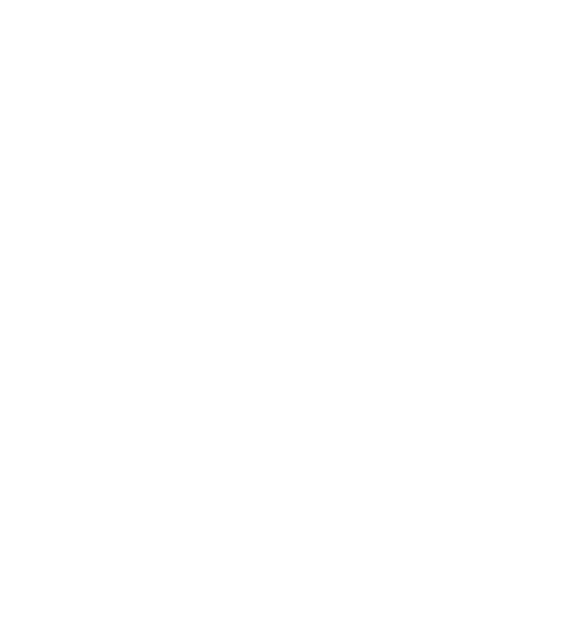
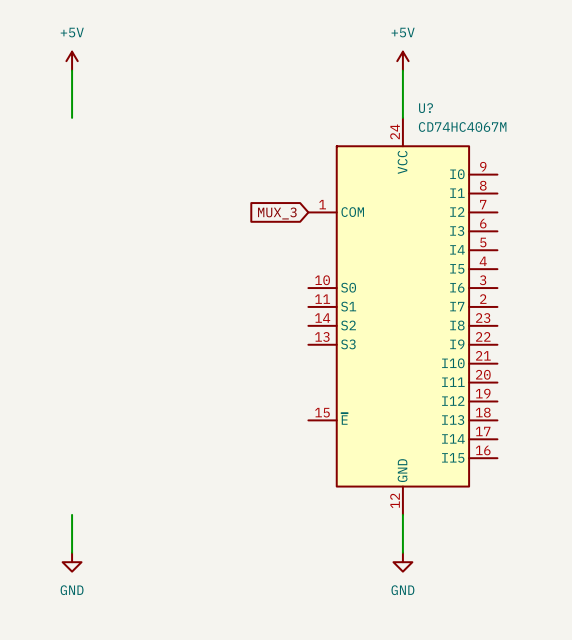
power symbol: none -> +5V (72, 61)
power symbol: none -> +5V (402, 61)
wire: none -> (72, 70) (72, 117)
wire: none -> (402, 70) (402, 117)
global label: none -> MUX_3 (277, 213)
U?: none -> CD74HC4067M (402, 316)
wire: none -> (72, 514) (72, 552)
wire: none -> (402, 514) (402, 552)
power symbol: none -> GND (72, 562)
power symbol: none -> GND (402, 562)

